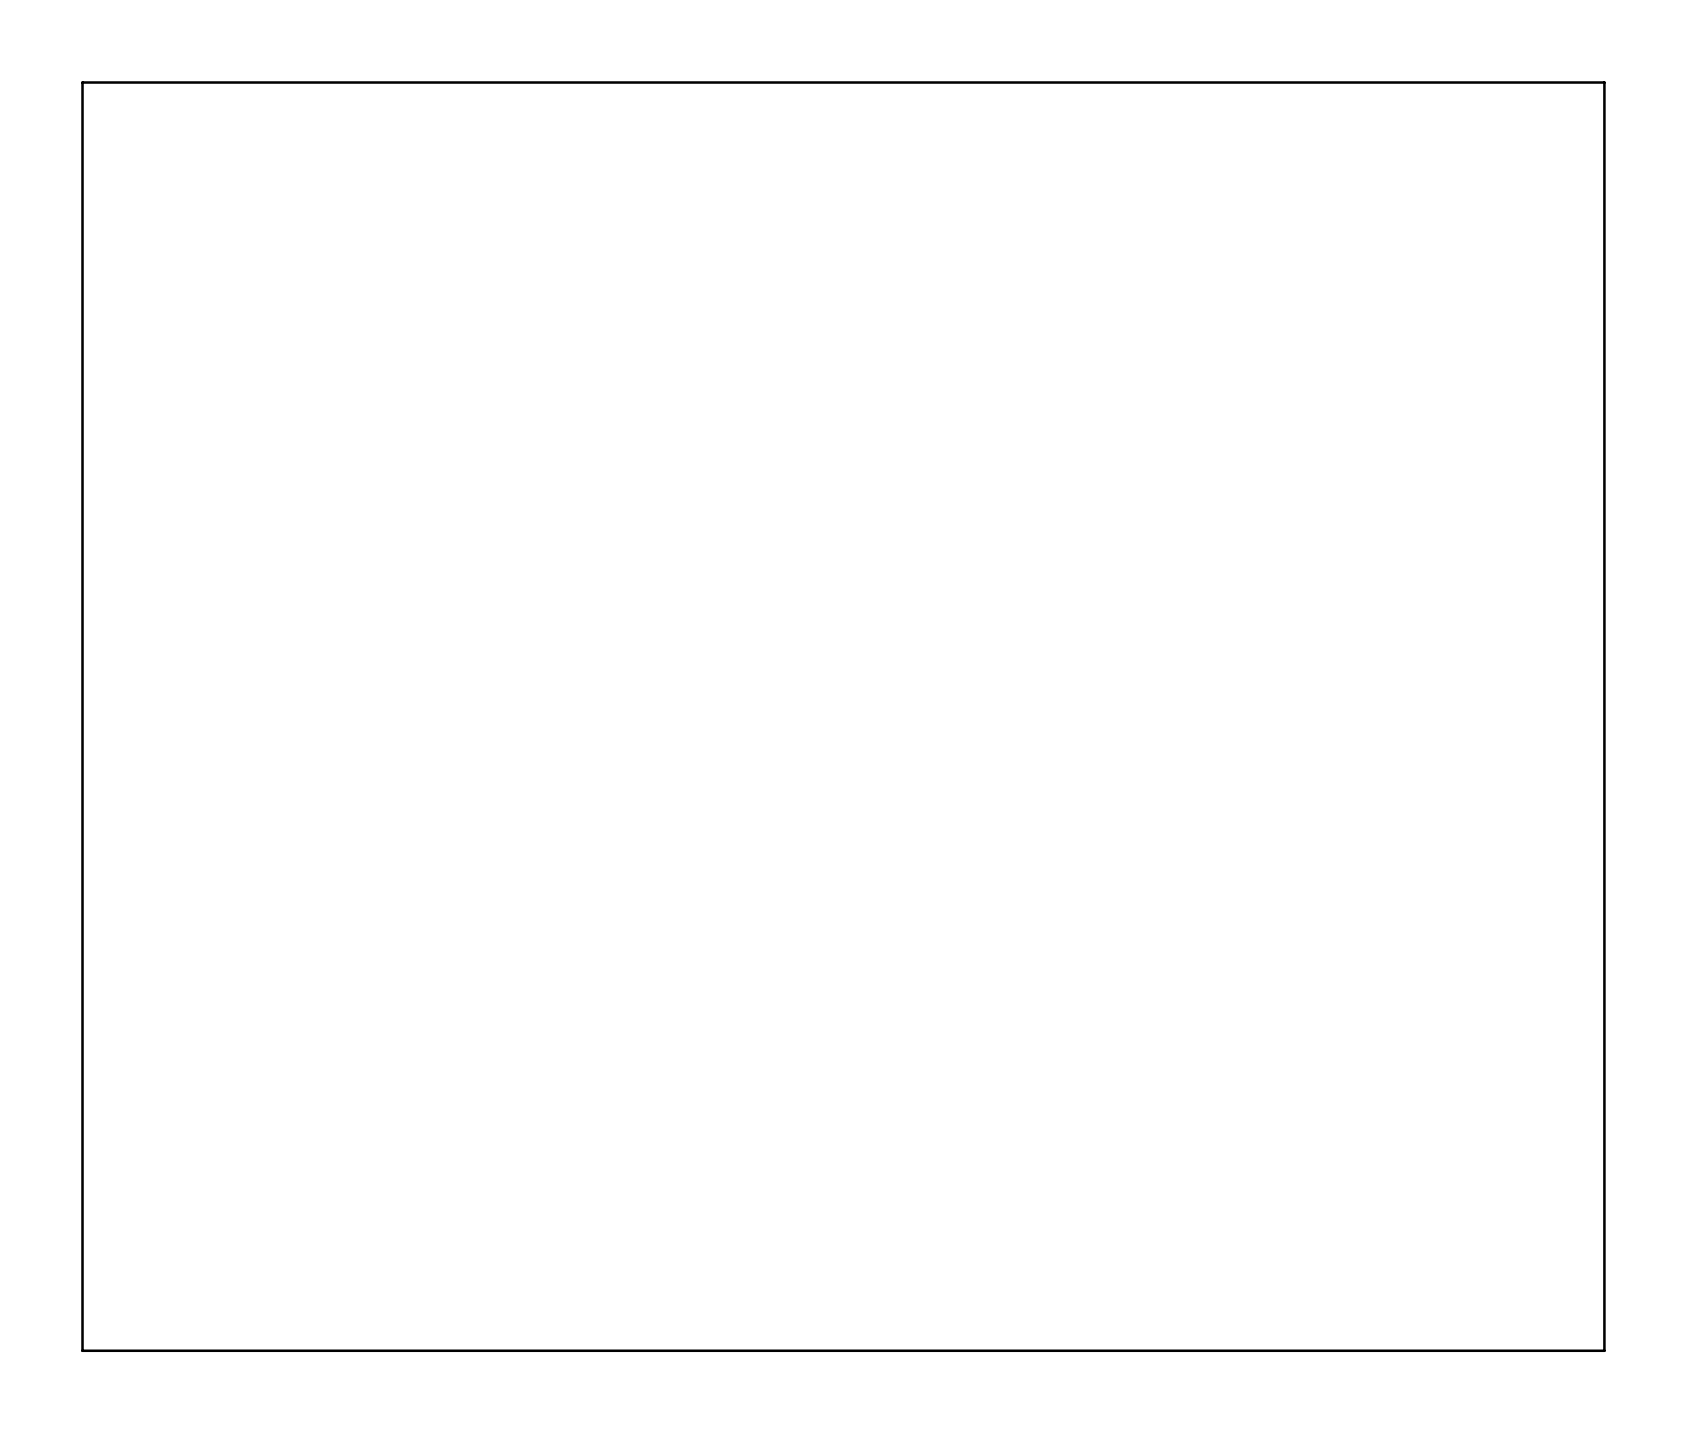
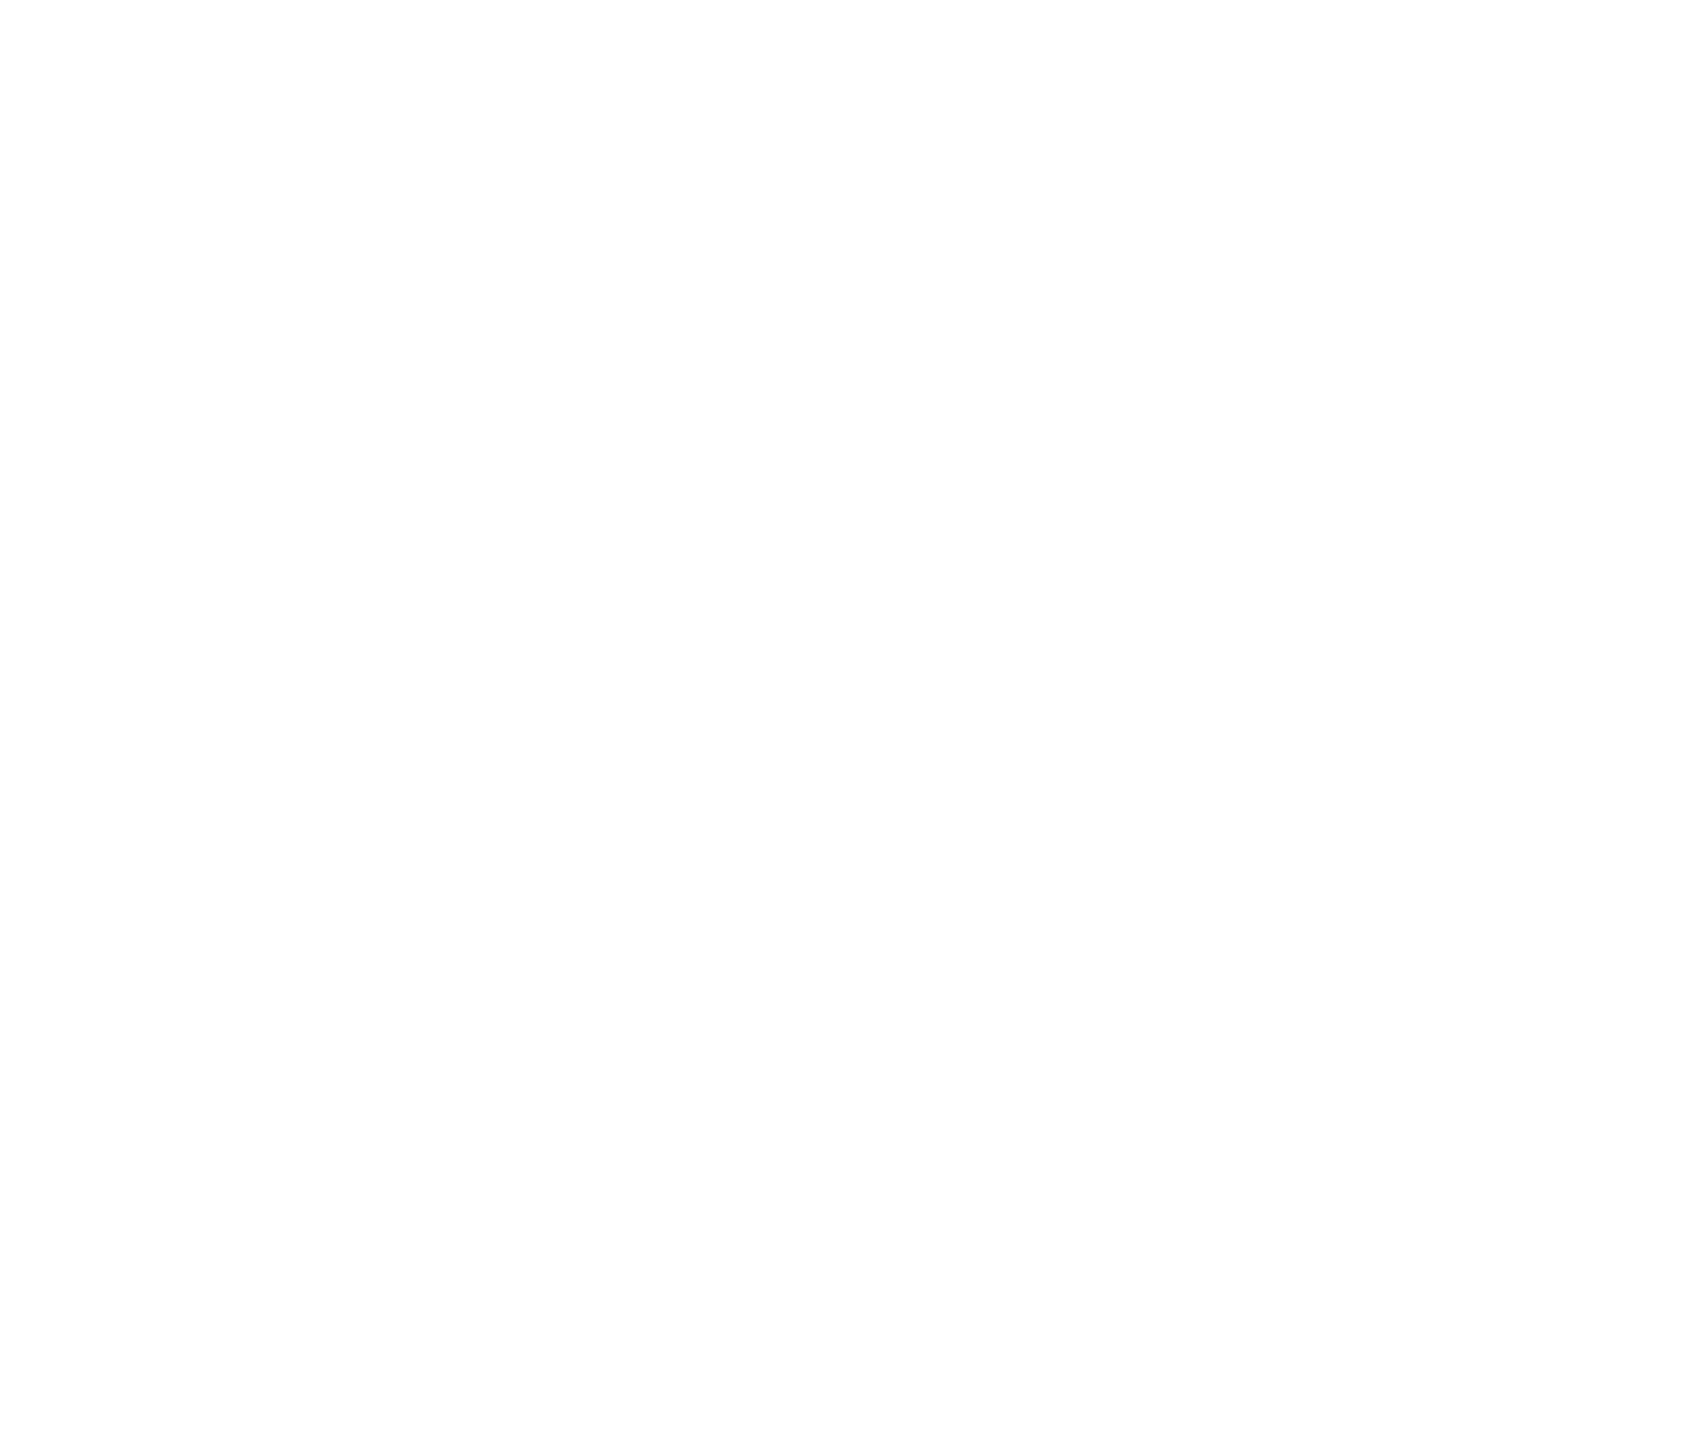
board edge: (82, 82) (1604, 82) (1604, 1350) (82, 1350) (82, 82) -> none

